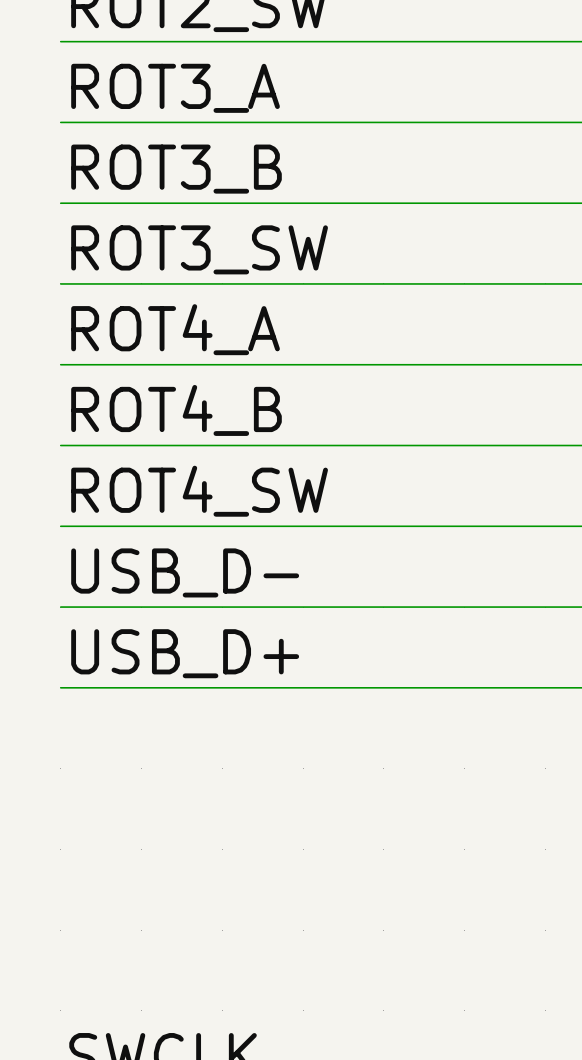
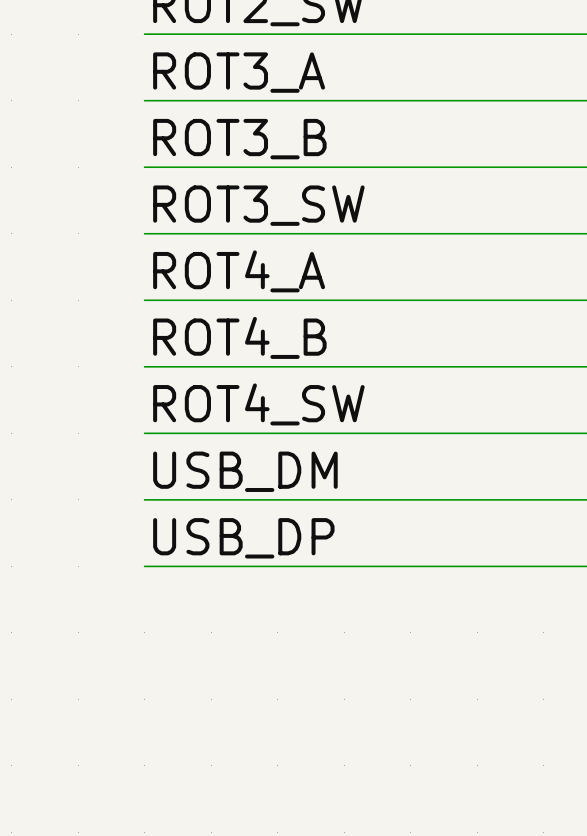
label: USB_D- (185, 572) -> USB_DM (245, 471)
label: USB_D+ (185, 653) -> USB_DP (243, 538)

